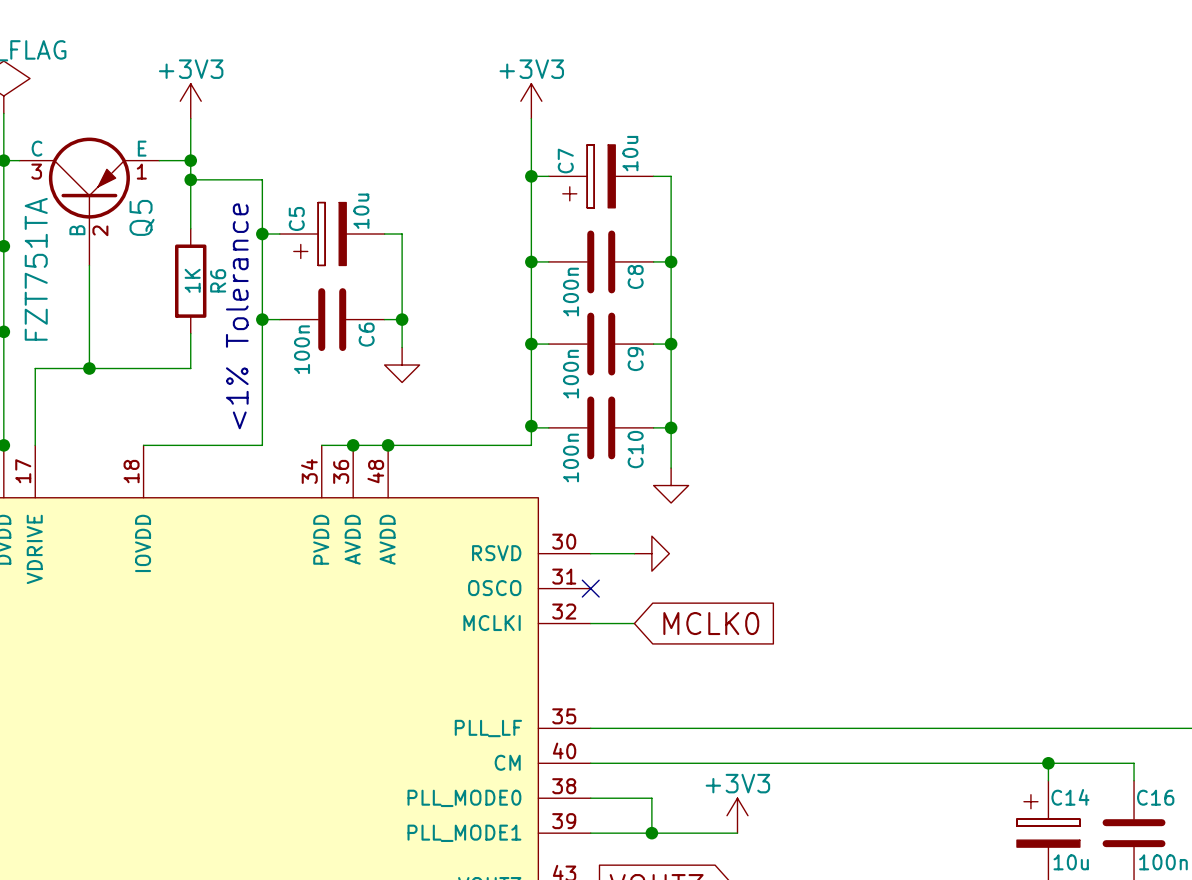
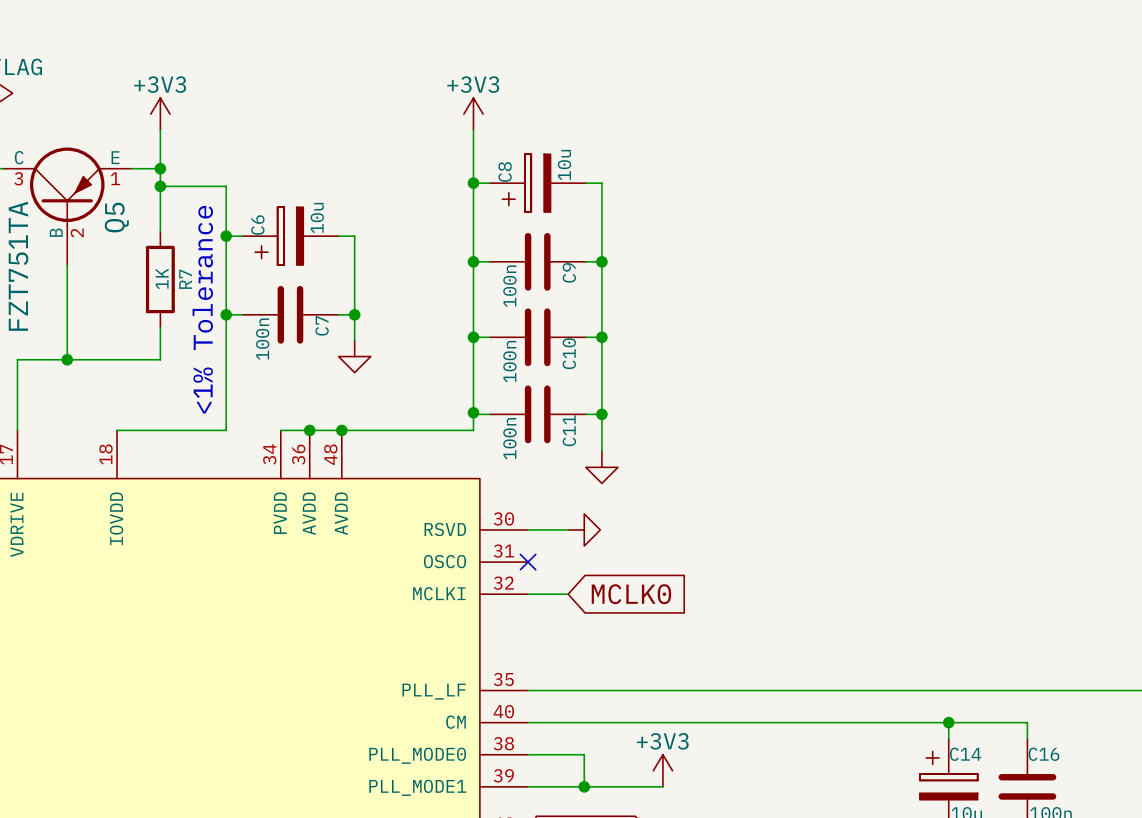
C7 name: C7 (565, 161) -> C8 (505, 171)
C5 name: C5 (296, 218) -> C6 (257, 225)
C8 name: C8 (635, 276) -> C9 (569, 272)
R6 name: R6 (218, 280) -> R7 (185, 279)
C6 name: C6 (366, 334) -> C7 (322, 325)
C9 name: C9 (635, 359) -> C10 (569, 353)
C10 name: C10 (635, 449) -> C11 (569, 430)

